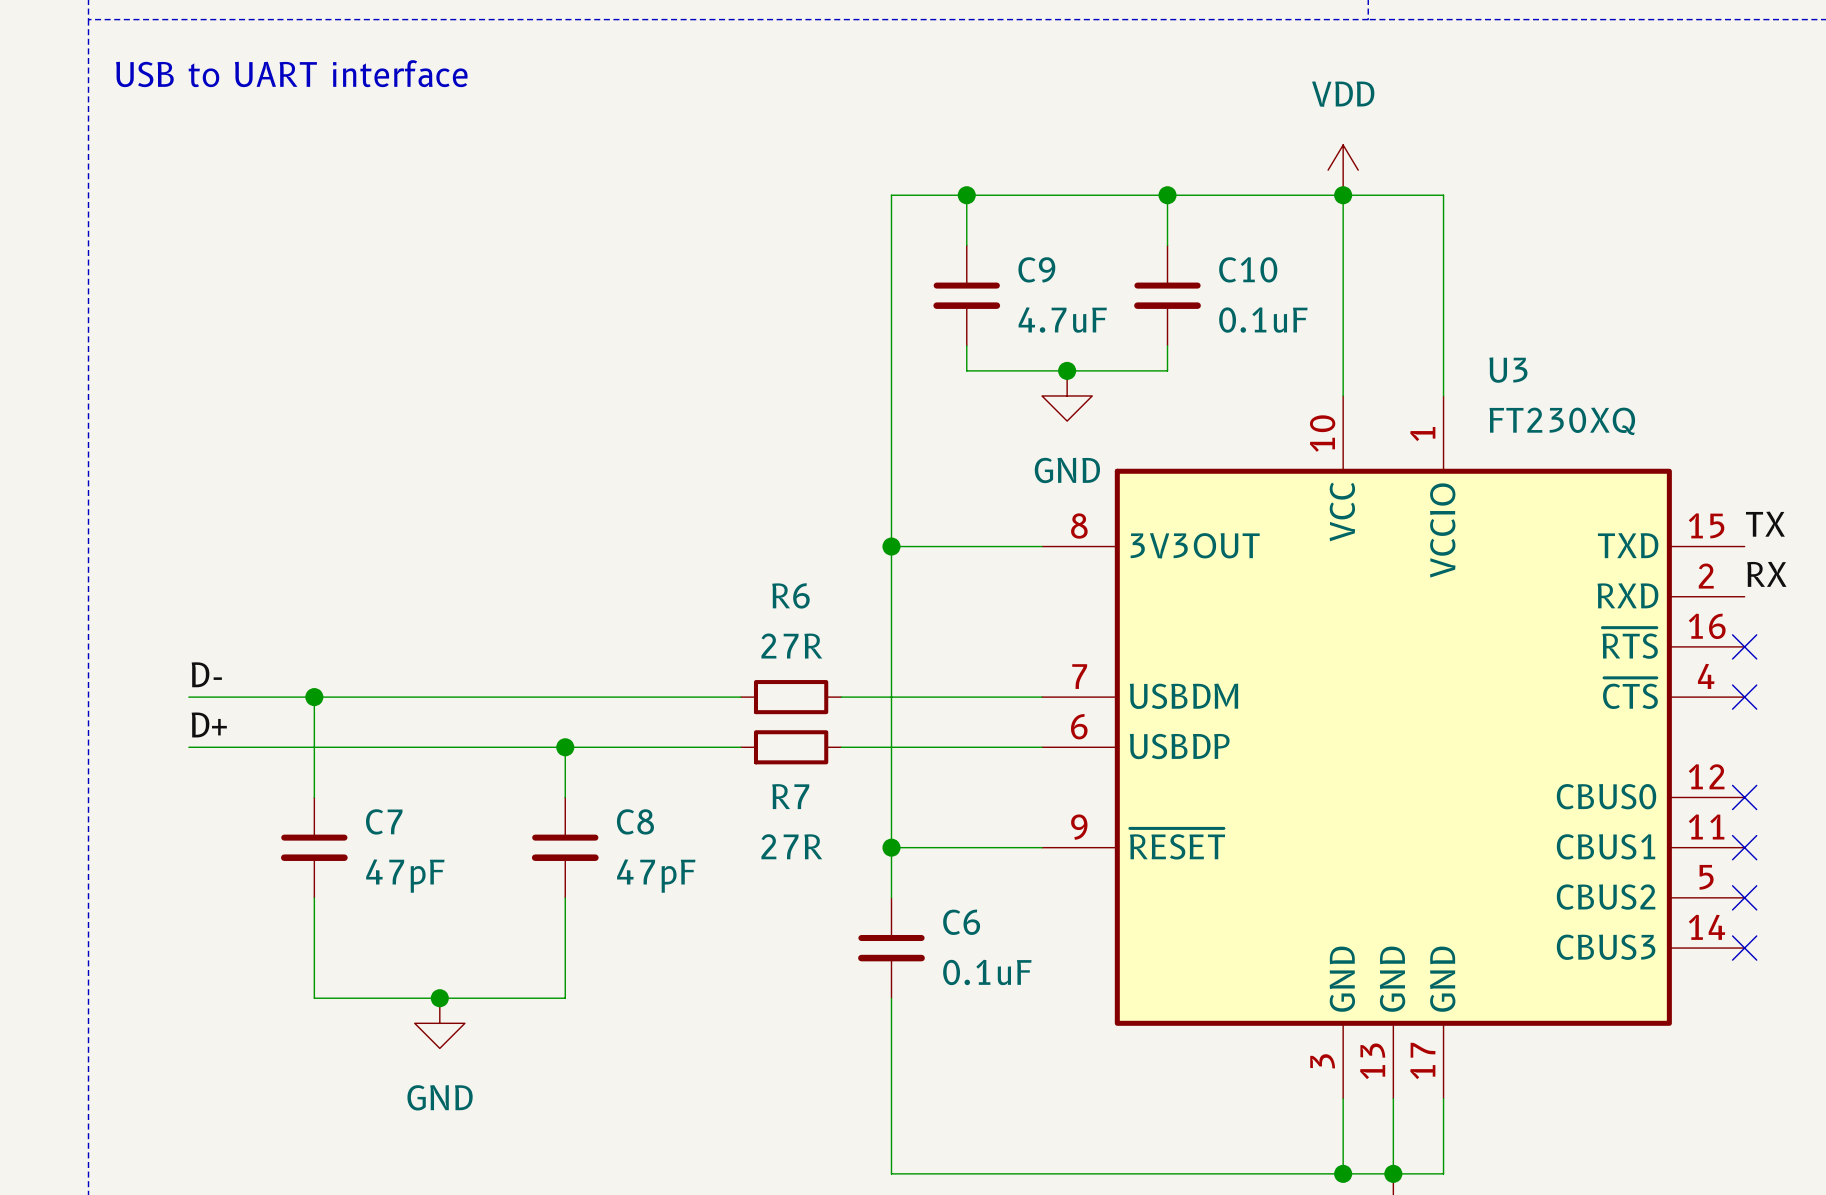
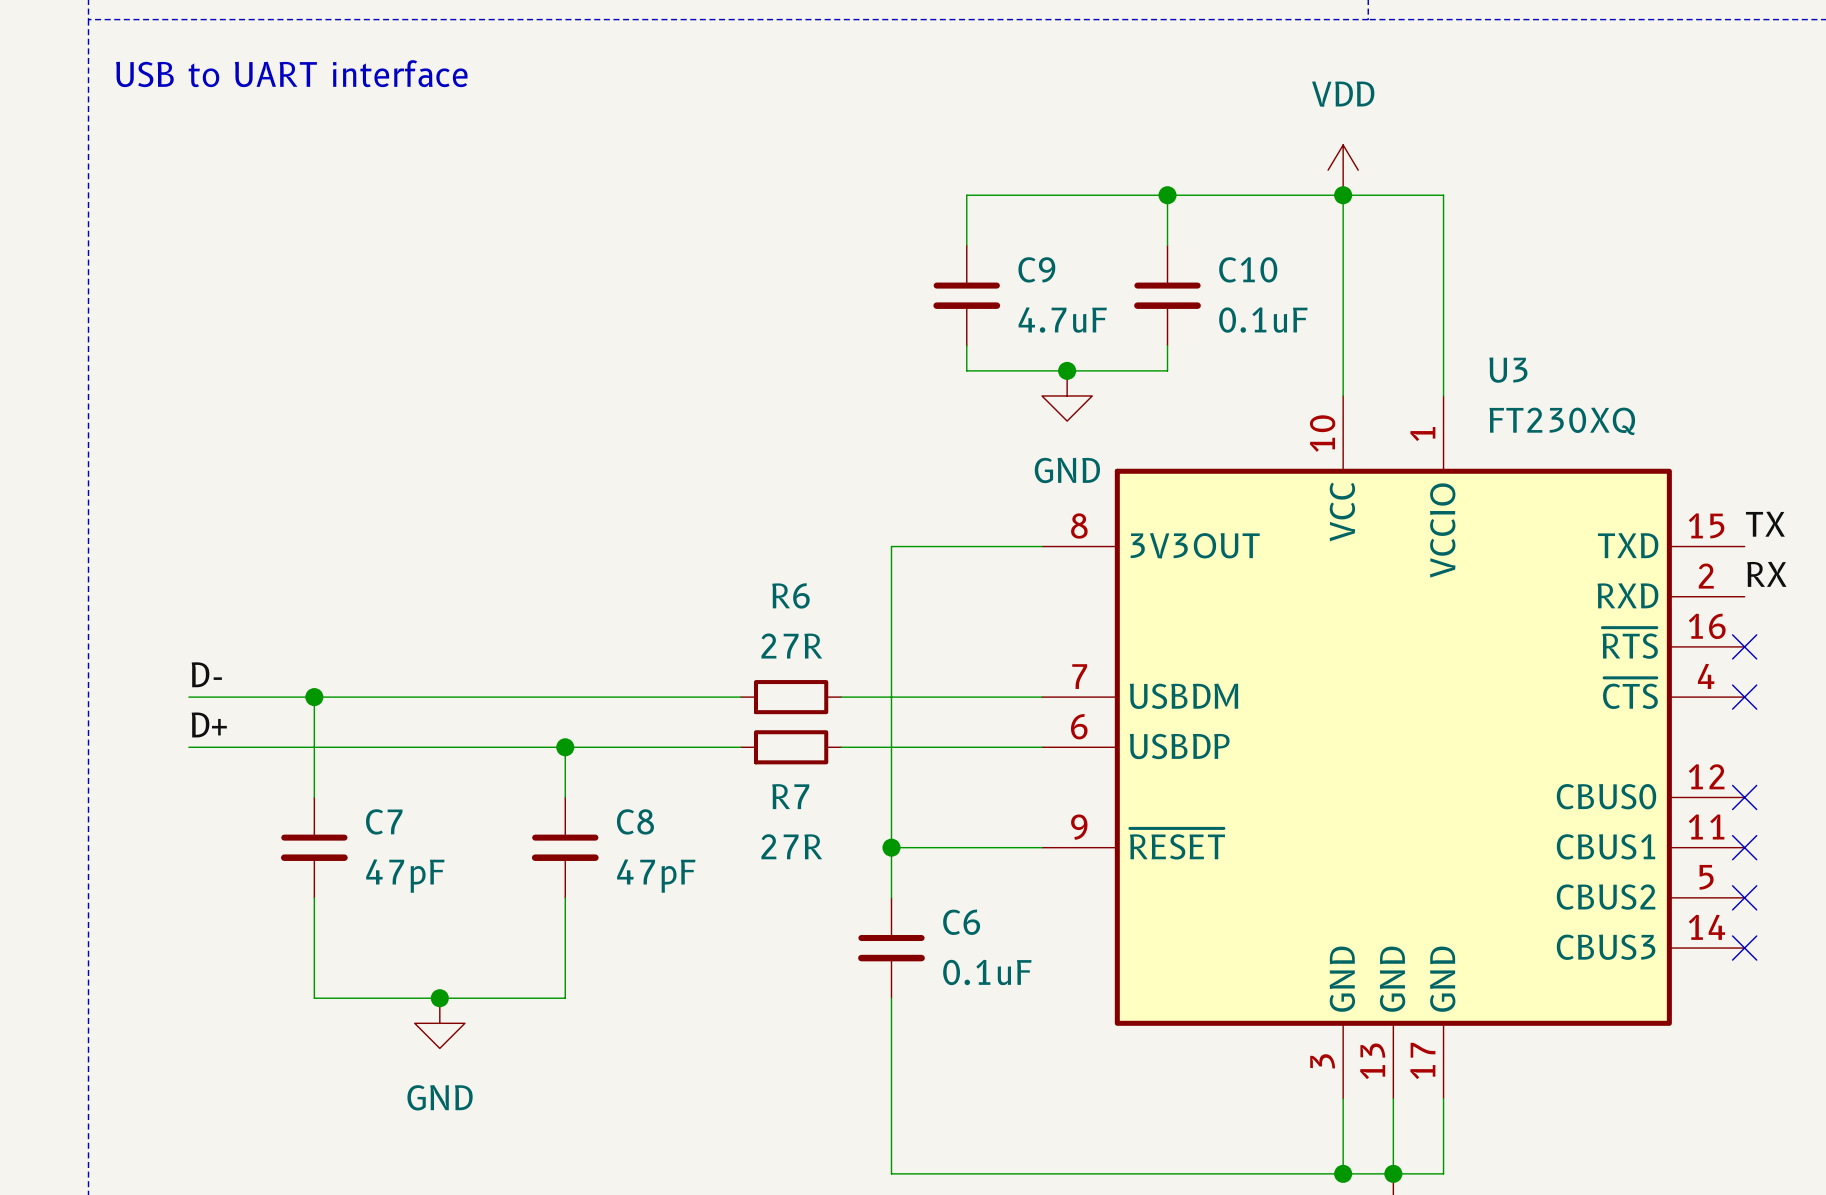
wire: (966, 195) (891, 195) (891, 546) -> none
junction: (966, 195) -> none
junction: (891, 546) -> none

